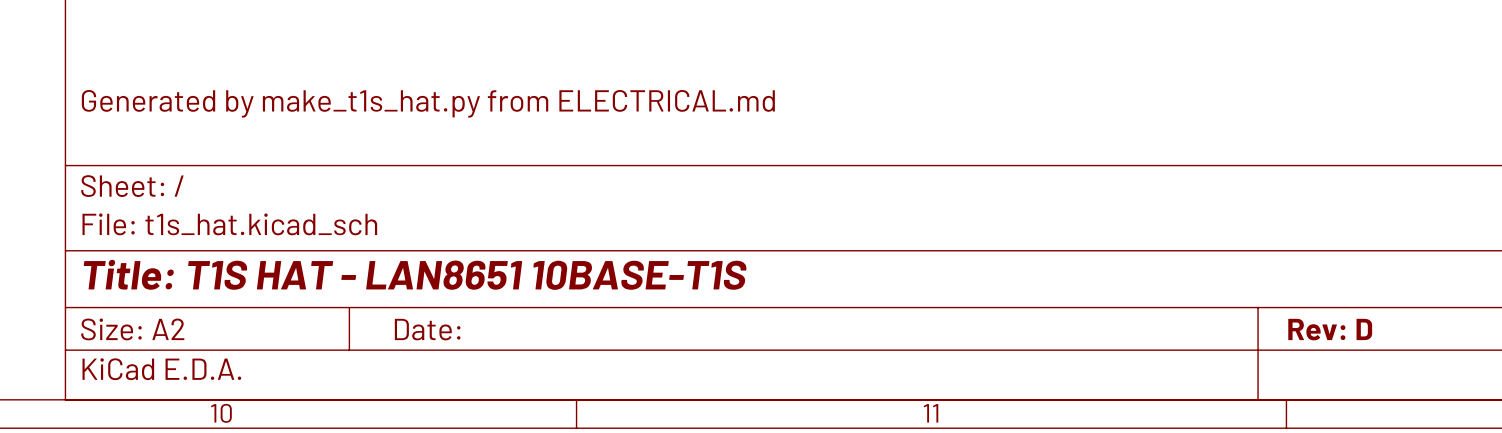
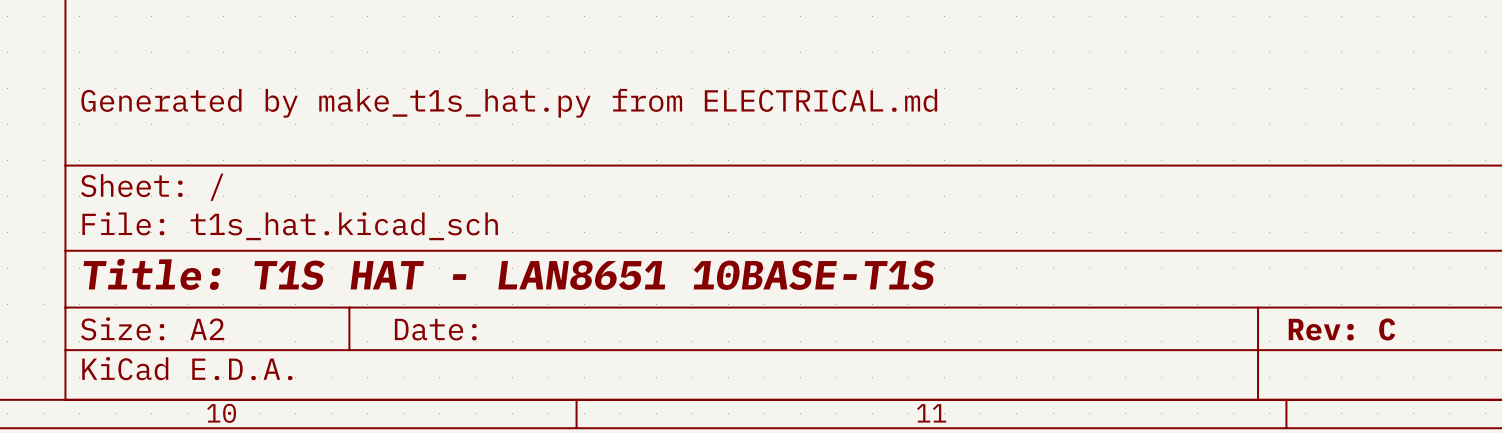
title block: Rev: D (1330, 329) -> Rev: C (1341, 329)

